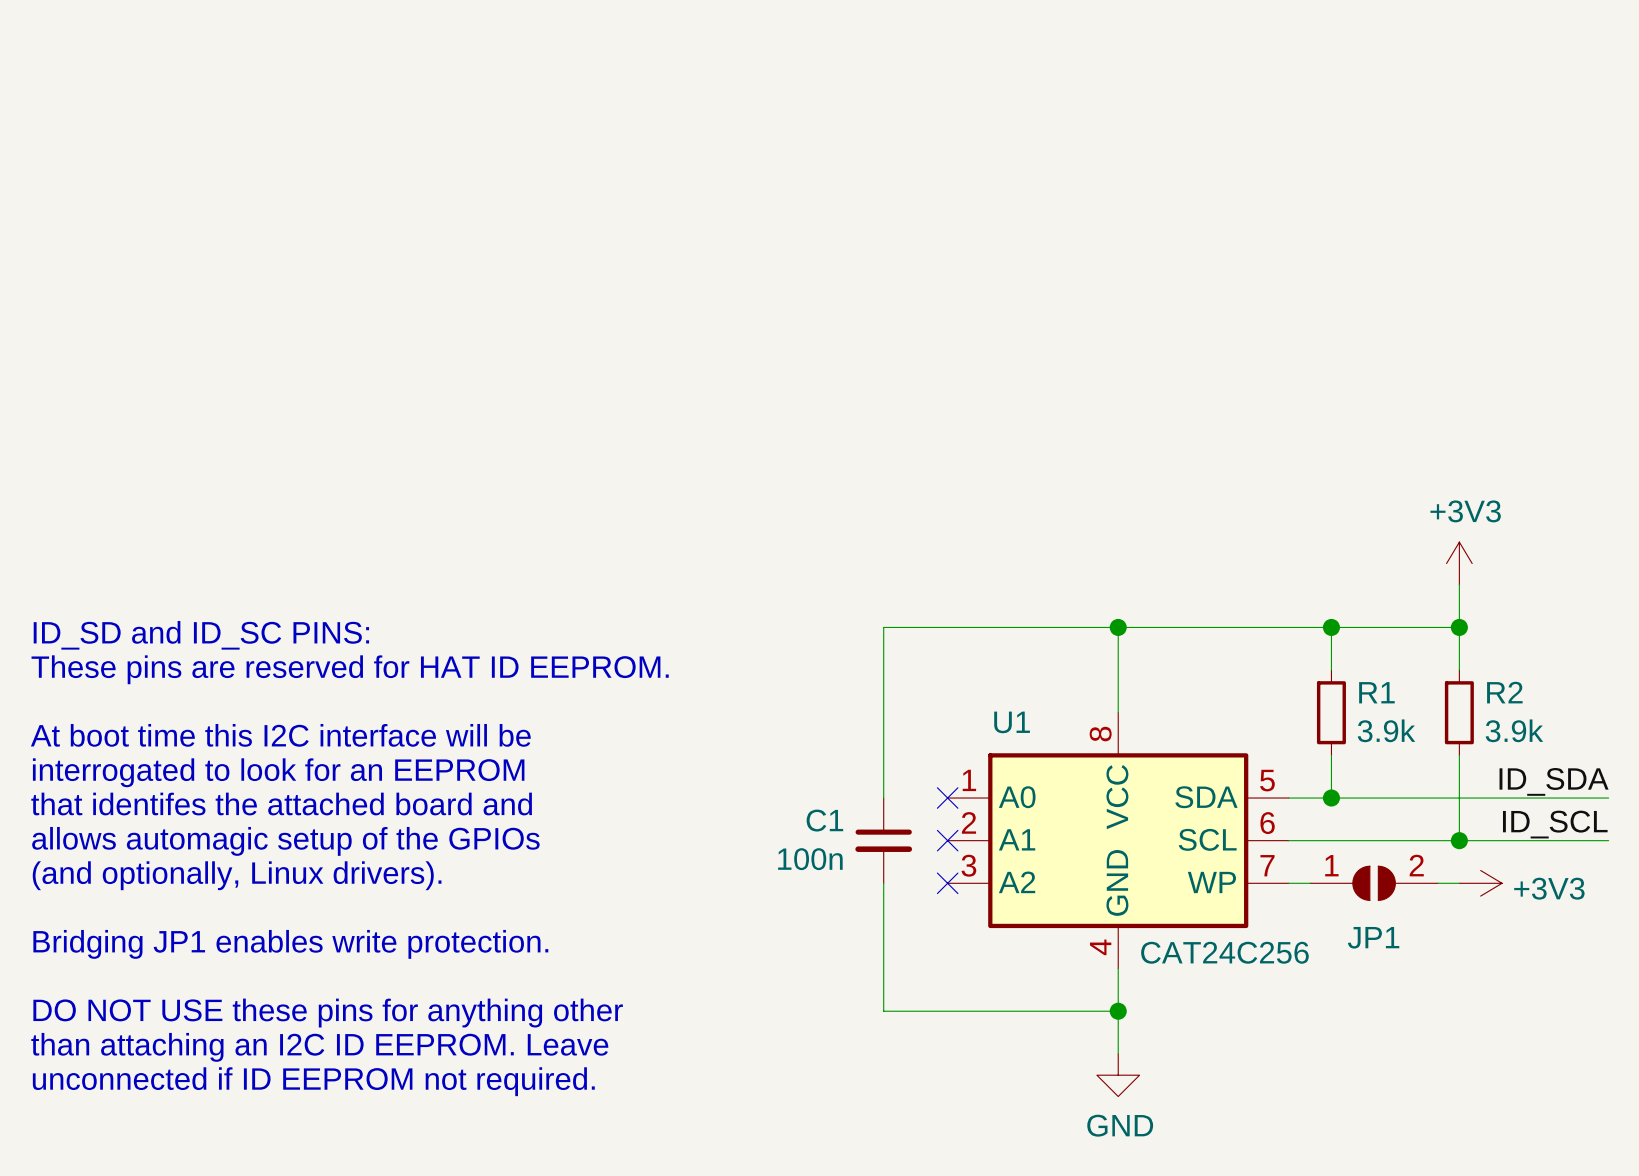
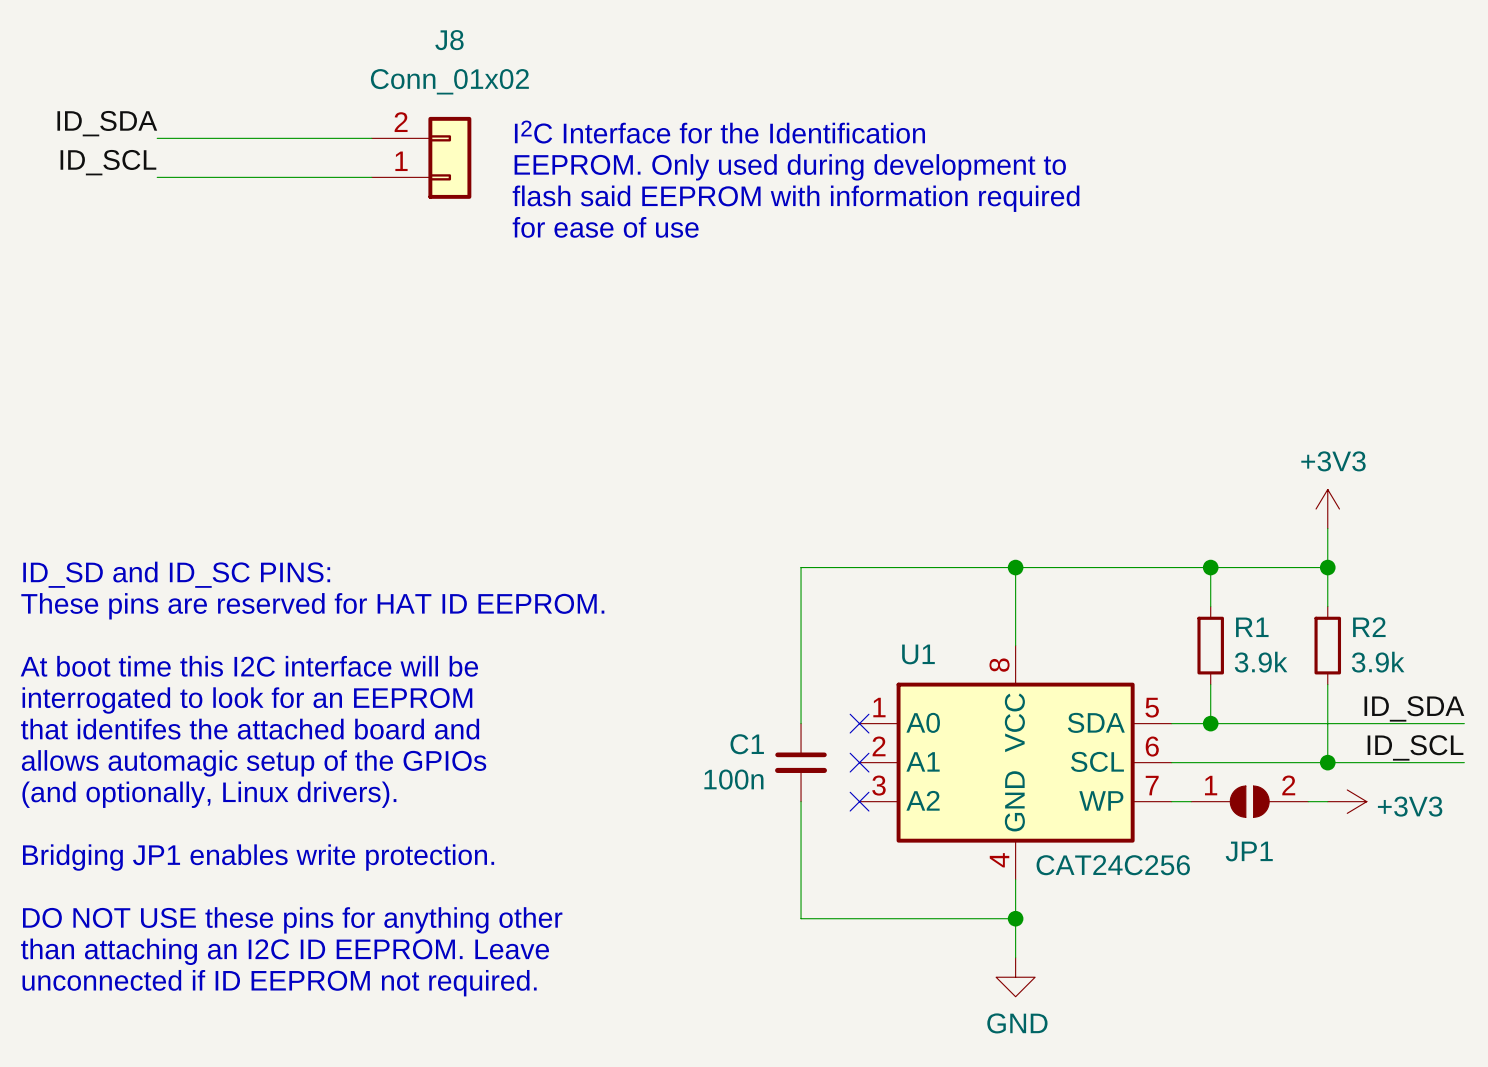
label: none -> ID_SDA (107, 123)
text: none -> I2C Interface for the Identification (719, 132)
wire: none -> (157, 138) (371, 138)
J8: none -> Conn_01x02 (421, 157)
label: none -> ID_SCL (108, 162)
text: none -> EEPROM. Only used during development to (790, 167)
wire: none -> (157, 177) (371, 177)
text: none -> flash said EEPROM with information required (796, 198)
text: none -> for ease of use (605, 227)

